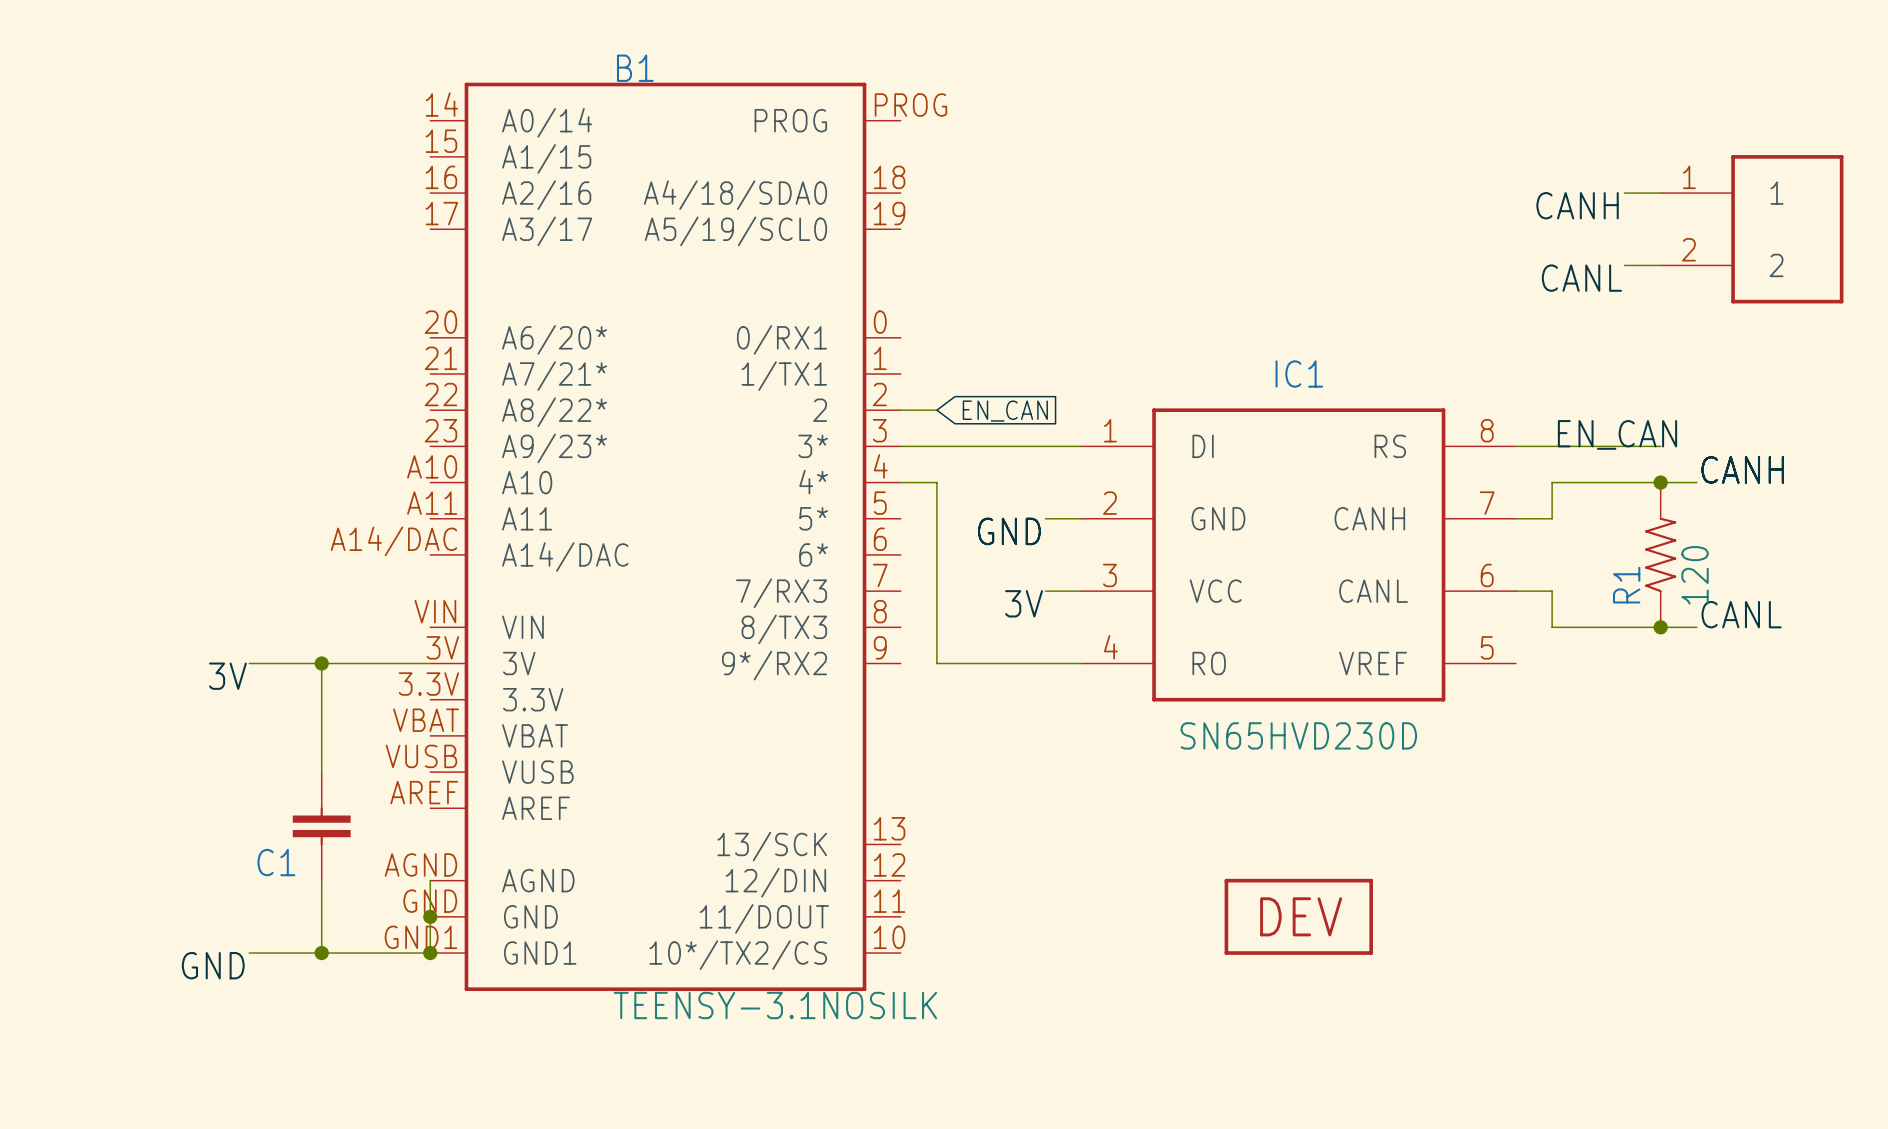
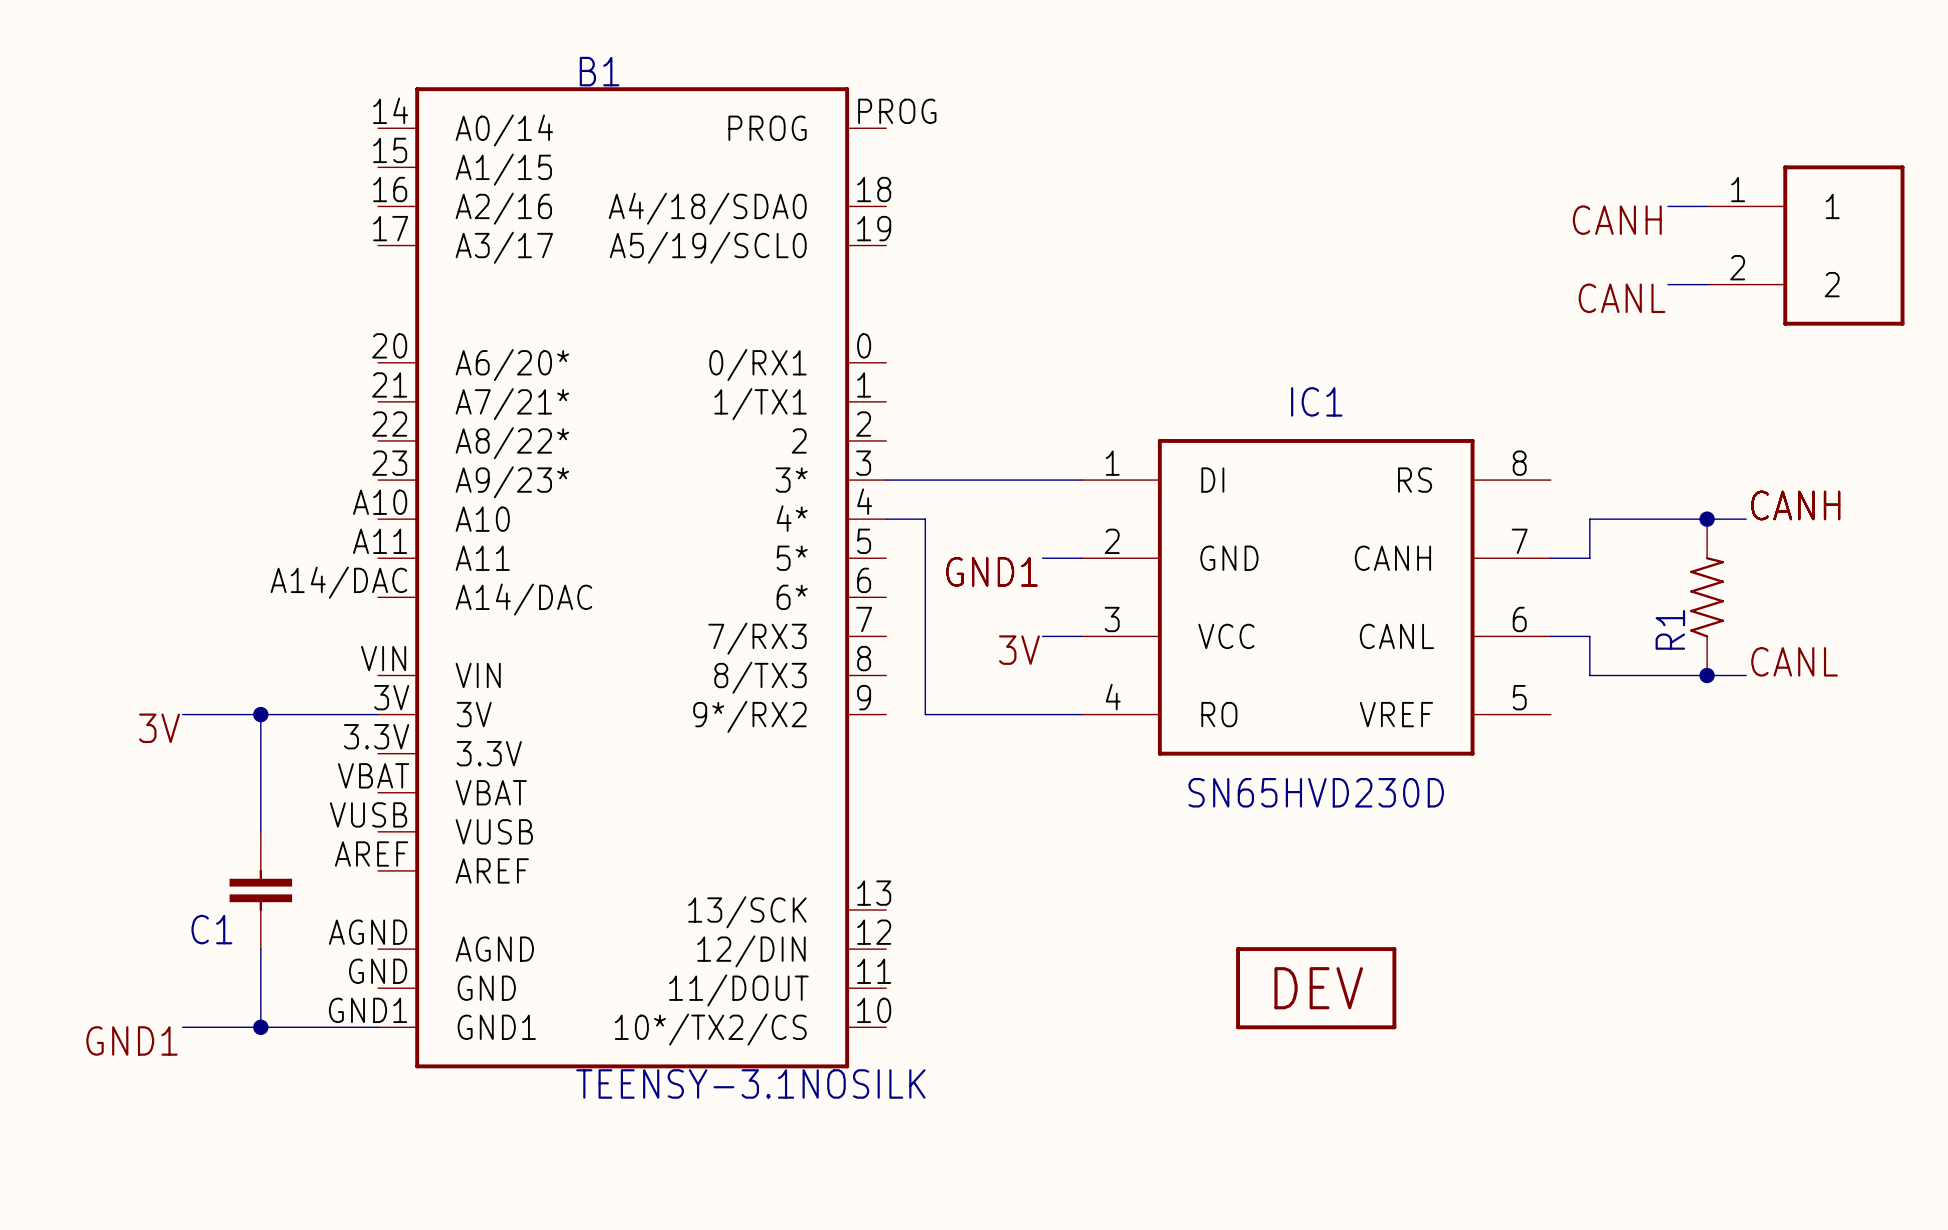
wire: (900, 410) (936, 410) -> none
global label: EN_CAN (1005, 411) -> none
label: EN_CAN (1617, 434) -> none
wire: (1515, 446) (1660, 446) -> none
label: GND (1009, 531) -> GND1 (991, 571)
R1 value: 120 (1695, 575) -> none
wire: (430, 880) (430, 953) -> none
junction: (430, 916) -> none
junction: (430, 953) -> none
label: GND (213, 965) -> GND1 (131, 1040)

